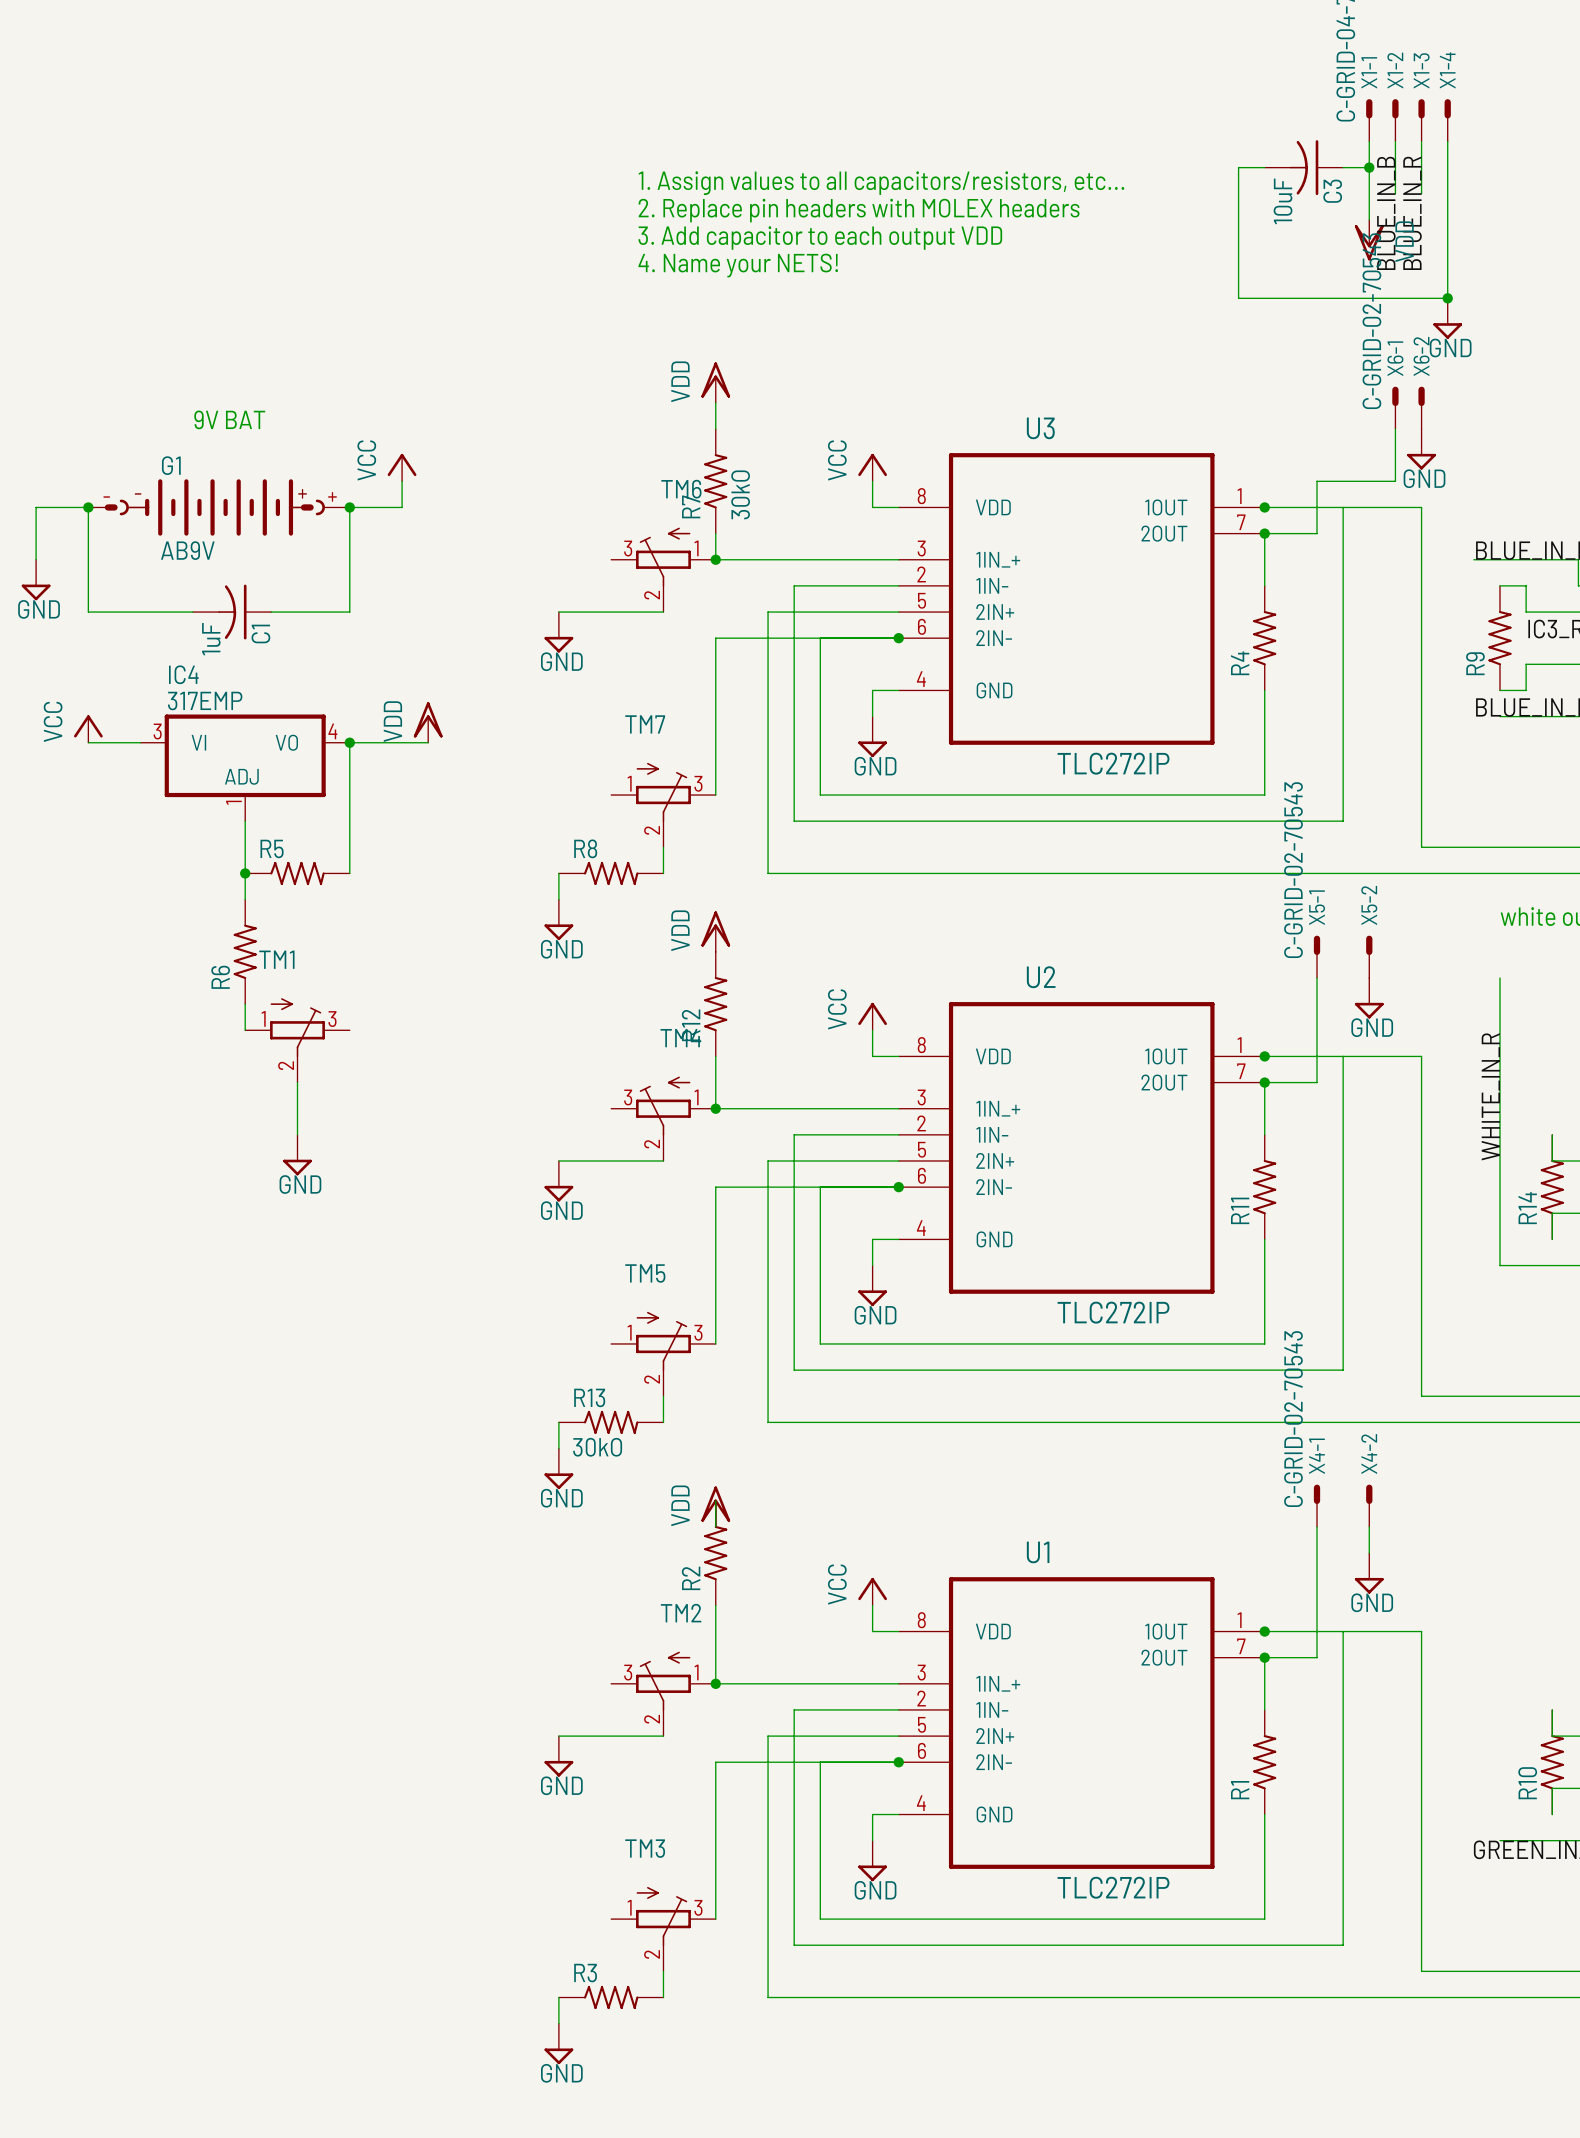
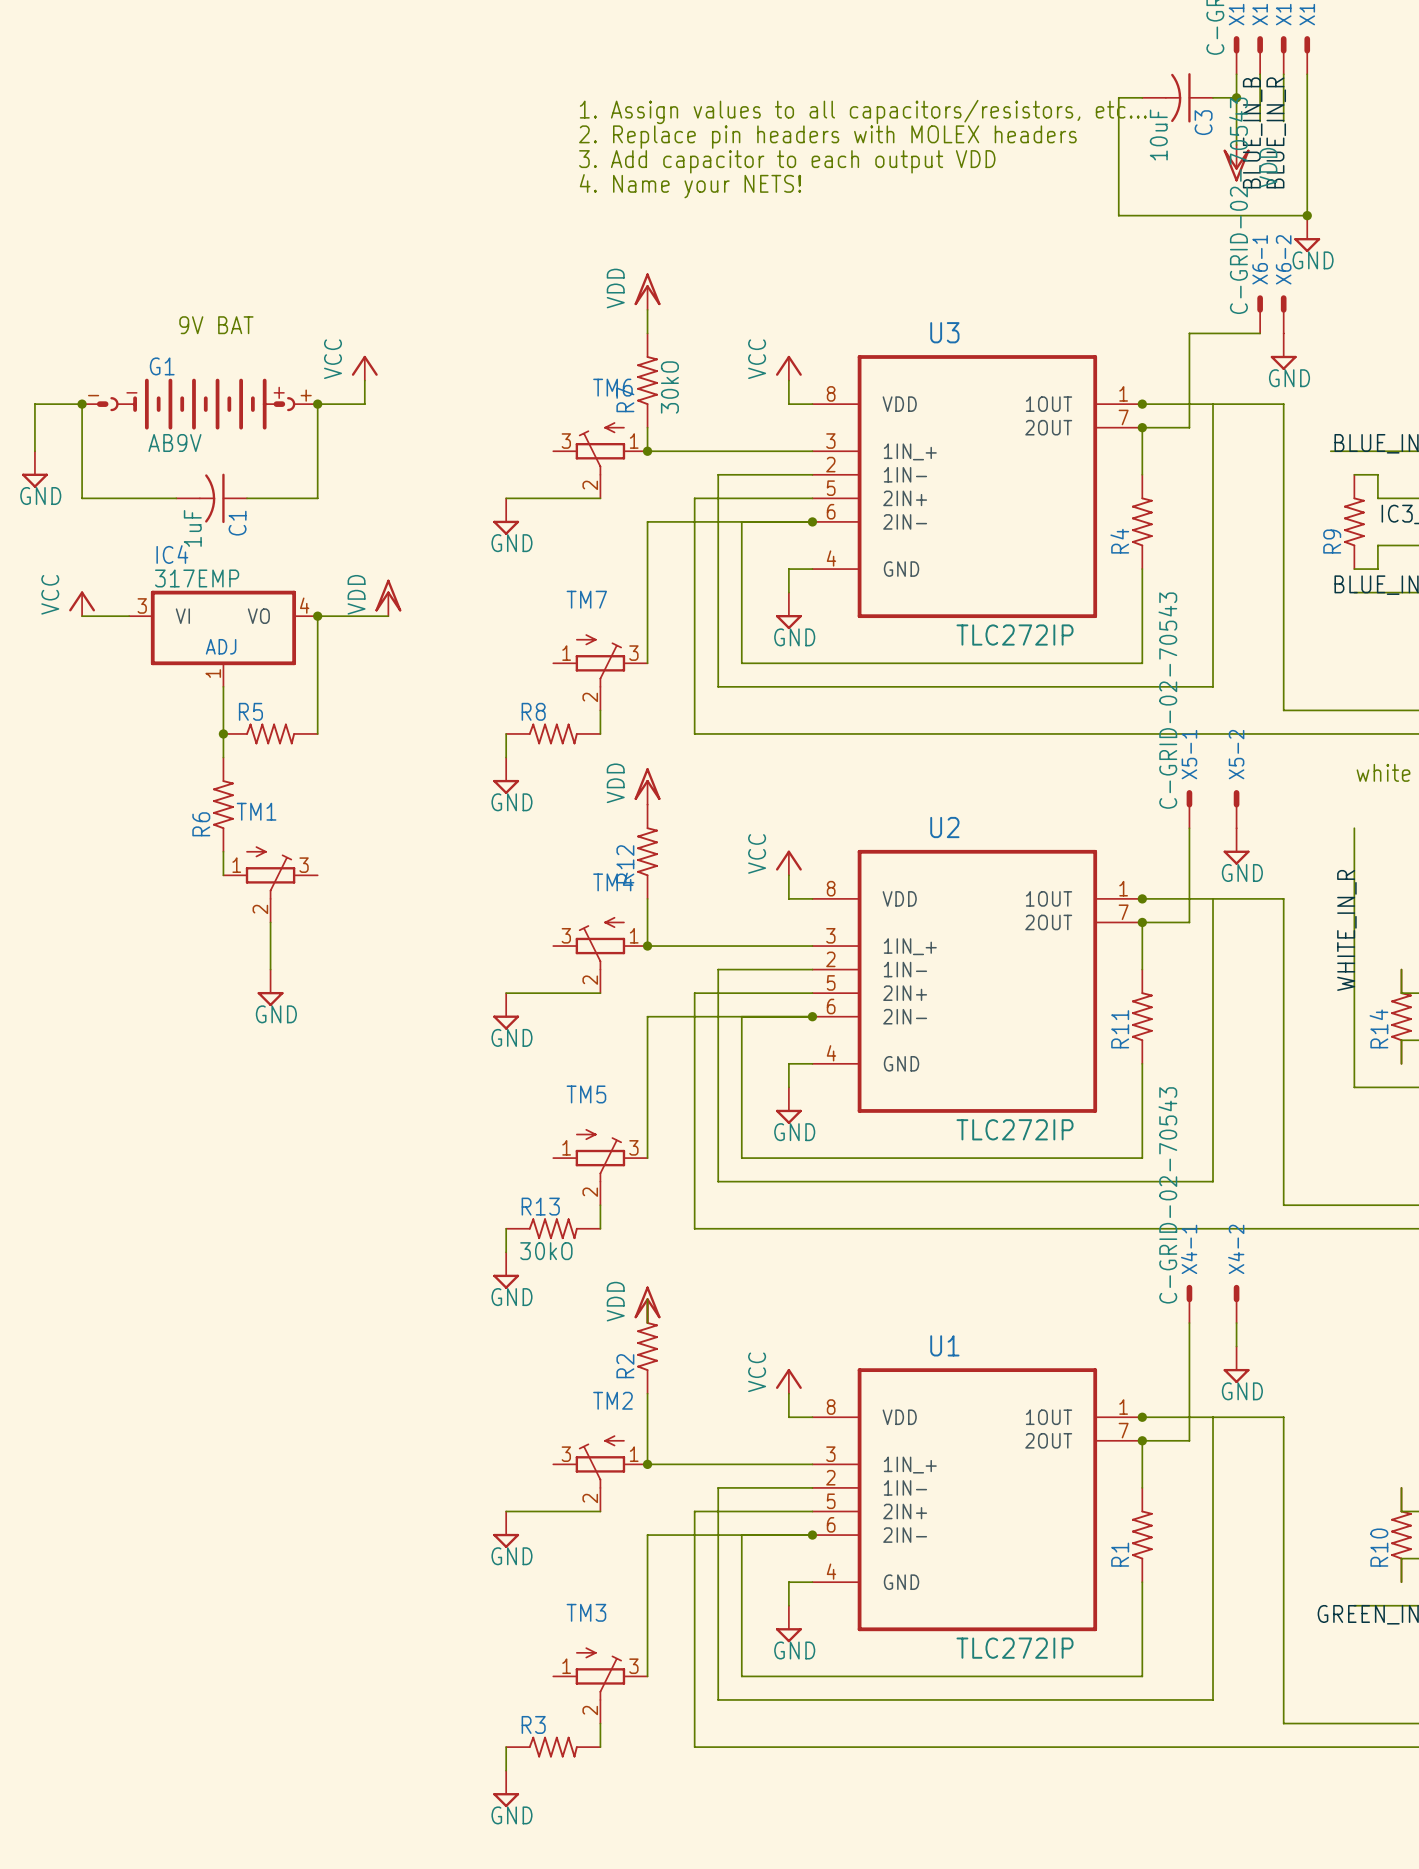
wire: (1395, 429) (1395, 481) (1317, 481) -> (1260, 333) (1189, 333) (1189, 380)

